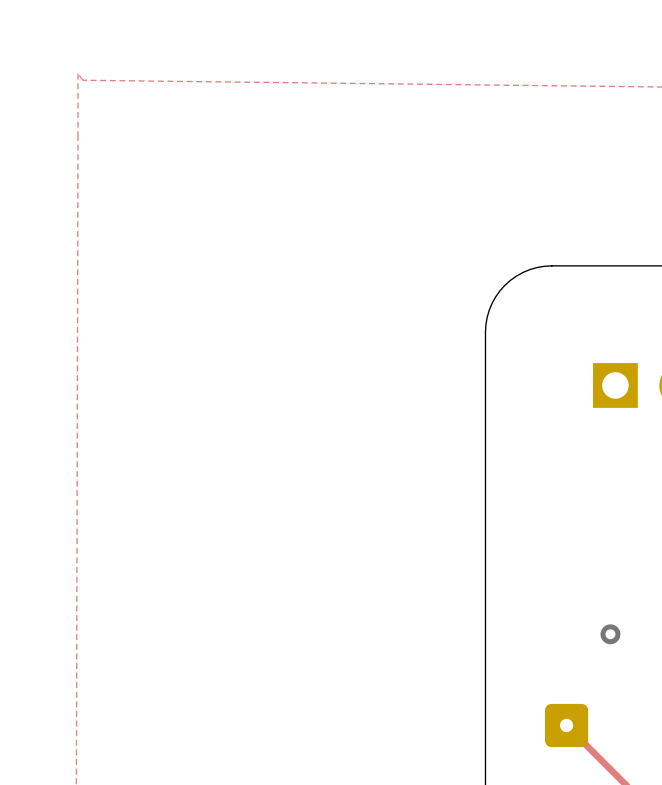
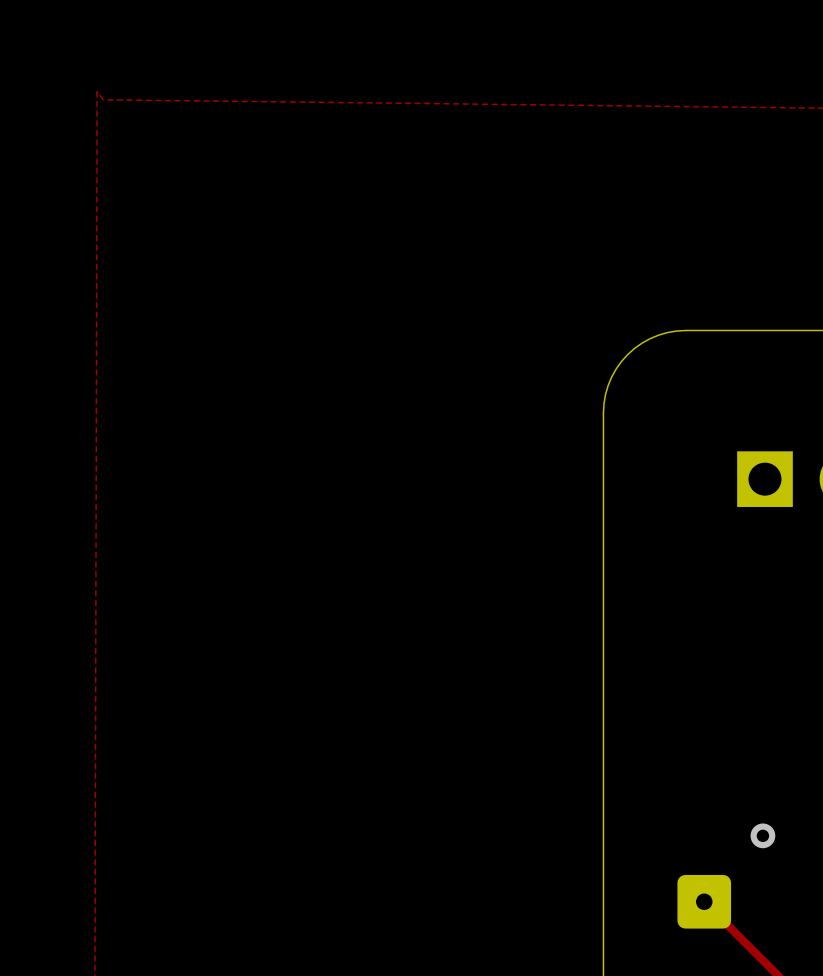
via position: (610, 634) -> (762, 835)

